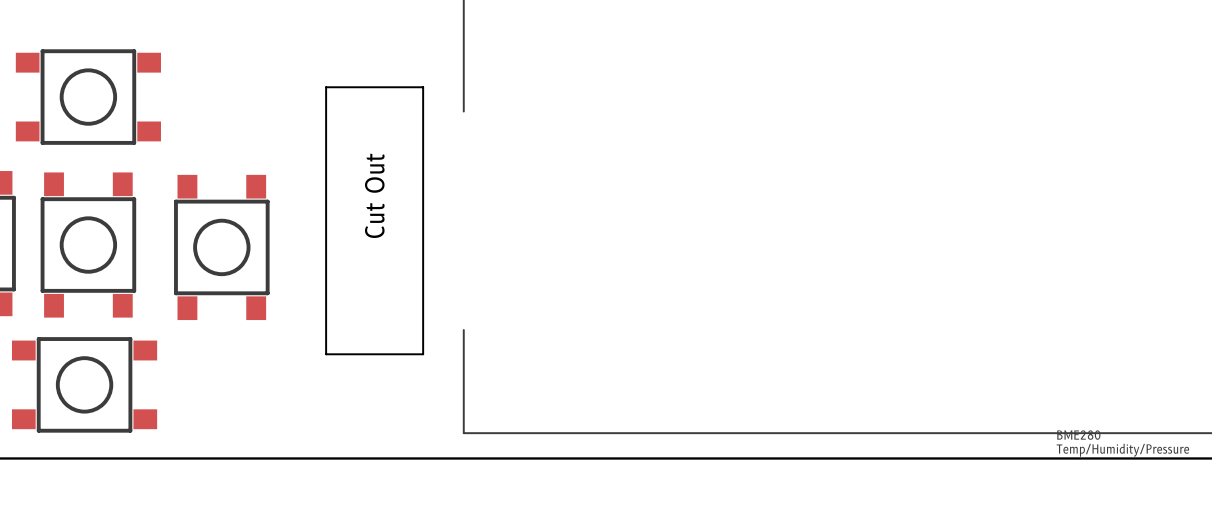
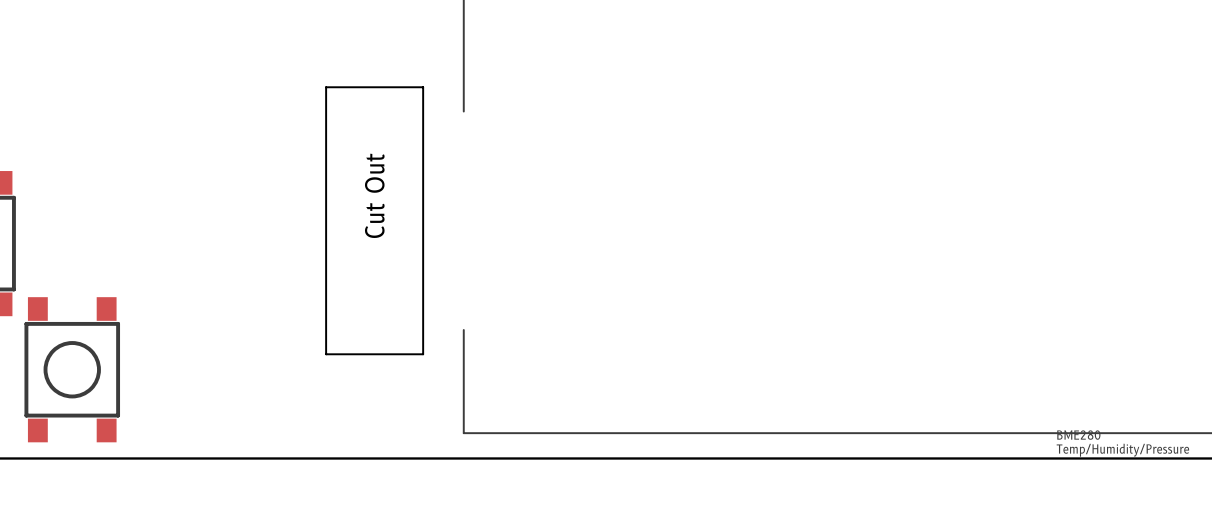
part: (88, 97) -> none
part: (88, 245) -> none
part: (221, 247) -> none
part rotation: 0° (84, 384) -> 90° clockwise (72, 369)

